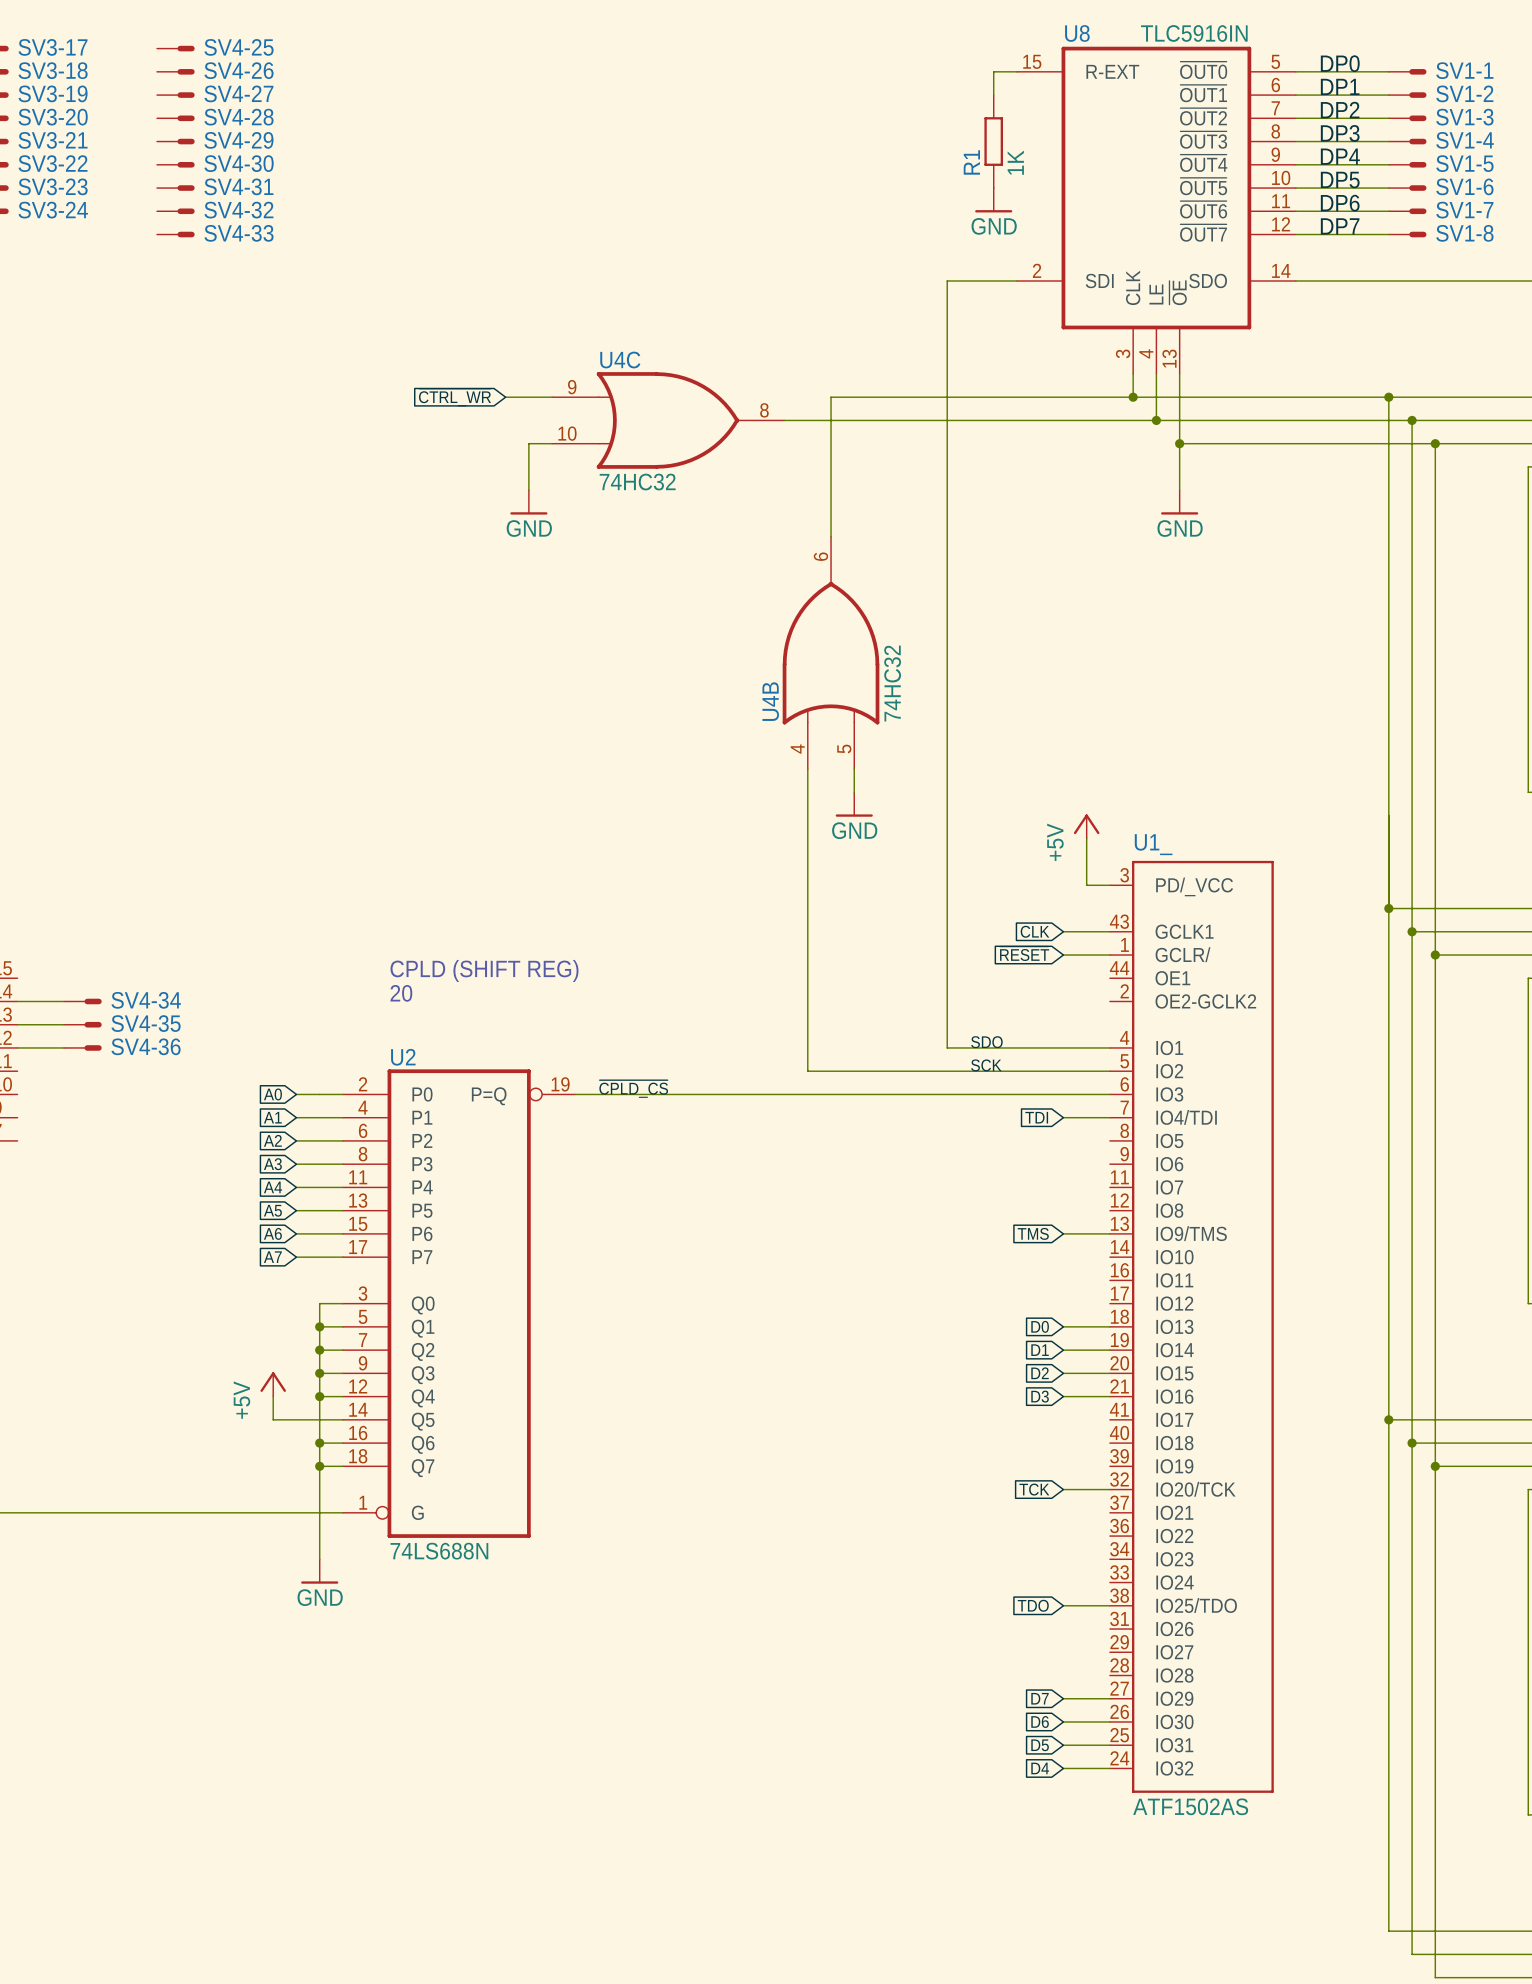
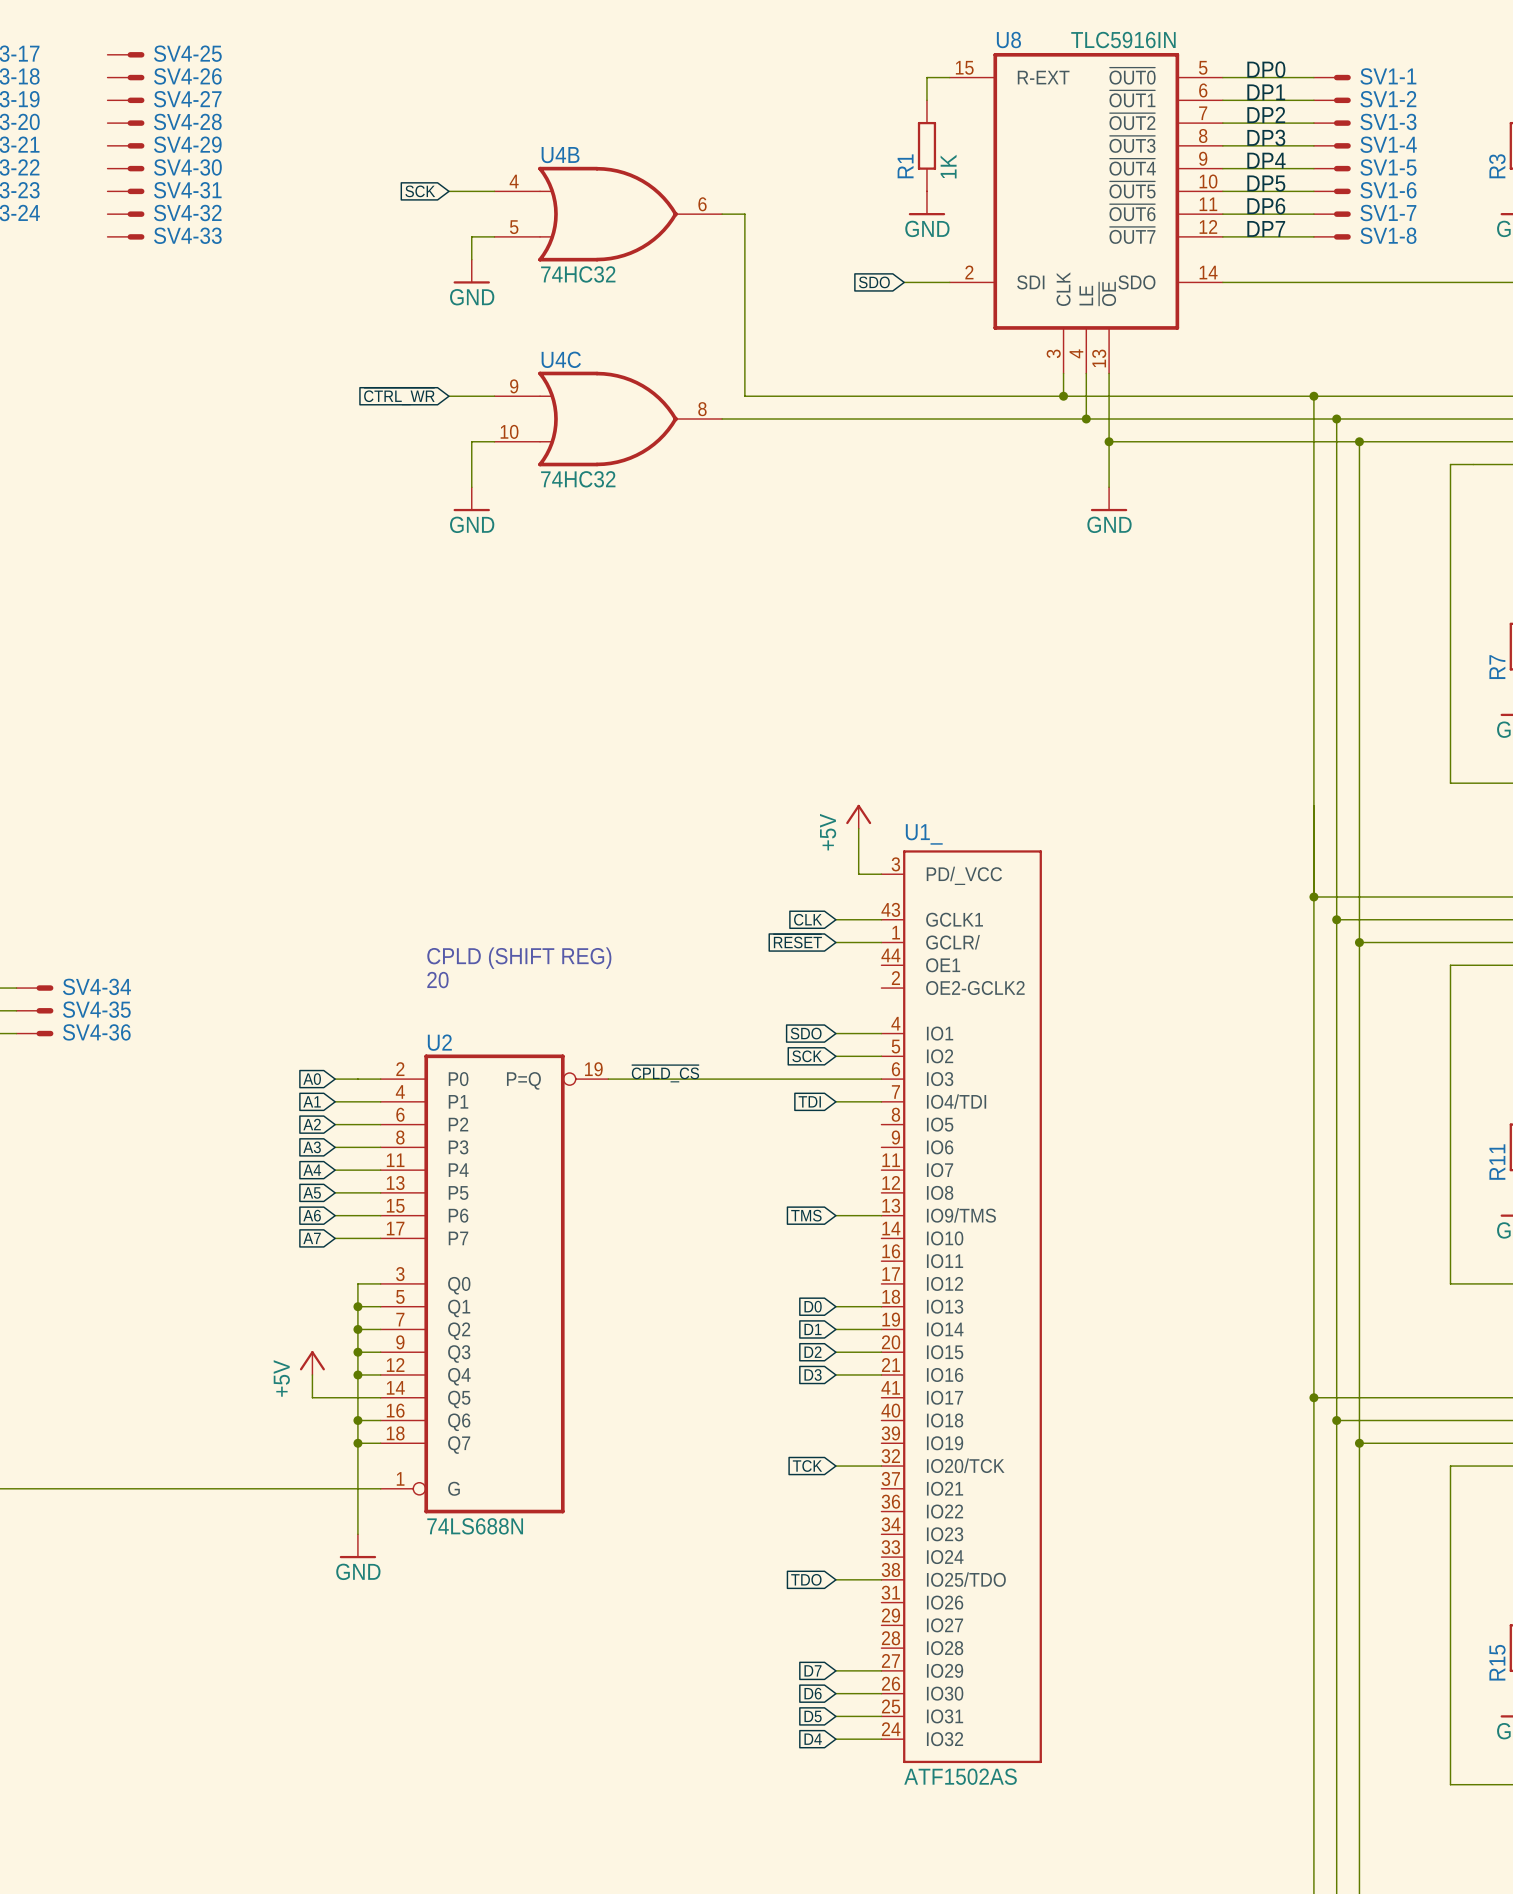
global label: none -> SCK (420, 191)
wire: none -> (448, 191) (494, 191)
wire: none -> (494, 236) (471, 236) (471, 259)
power symbol: none -> GND (471, 271)
global label: none -> SDO (874, 282)
wire: (970, 281) (947, 281) (947, 1047) (1109, 1047) -> none
wire: (831, 397) (831, 536) -> (767, 396) (744, 396) (744, 214) (722, 214)
U4B position: (831, 652) -> (608, 214)
U4B rotation: 0° (831, 653) -> 90° clockwise (607, 214)
wire: (807, 769) (807, 1071) (900, 1071) -> none
wire: (854, 769) (854, 792) -> none
power symbol: GND (854, 804) -> none
power symbol position: +5V (1086, 826) -> +5V (858, 816)
wire: (1086, 838) (1086, 885) (1109, 885) -> (858, 828) (858, 874) (881, 874)
global label position: CLK (1035, 931) -> CLK (808, 919)
wire: (1063, 931) (1109, 931) -> (835, 919) (881, 919)
global label position: ~{RESET} (1024, 953) -> ~{RESET} (797, 941)
wire: (1063, 955) (1109, 955) -> (835, 942) (881, 942)
text position: CPLD (SHIFT REG) (484, 970) -> CPLD (SHIFT REG) (519, 958)
text position: 20 (401, 993) -> 20 (437, 980)
label: SDO (986, 1042) -> none
global label: none -> SDO (806, 1033)
wire: none -> (835, 1033) (881, 1033)
label: SCK (986, 1065) -> none
global label: none -> SCK (807, 1056)
wire: (947, 1071) (1109, 1071) -> none
label position: ~{CPLD_CS} (633, 1088) -> ~{CPLD_CS} (665, 1073)
global label position: A0 (272, 1094) -> A0 (312, 1079)
wire: (296, 1094) (342, 1094) -> (335, 1079) (380, 1079)
wire: (575, 1094) (668, 1094) -> none
wire: (947, 1094) (1109, 1094) -> none
global label position: A1 (272, 1117) -> A1 (312, 1101)
wire: (296, 1117) (342, 1117) -> (335, 1101) (380, 1101)
global label position: TDI (1036, 1117) -> TDI (809, 1101)
wire: (1063, 1117) (1109, 1117) -> (835, 1101) (881, 1101)
global label position: A2 (272, 1140) -> A2 (312, 1124)
wire: (296, 1140) (342, 1140) -> (335, 1124) (380, 1124)
global label position: A3 (272, 1164) -> A3 (312, 1147)
wire: (296, 1164) (342, 1164) -> (335, 1147) (380, 1147)
global label position: A4 (273, 1187) -> A4 (312, 1170)
wire: (296, 1187) (342, 1187) -> (335, 1170) (380, 1170)
global label position: A5 (272, 1210) -> A5 (312, 1192)
wire: (296, 1210) (342, 1210) -> (335, 1192) (380, 1192)
global label position: A6 (272, 1233) -> A6 (312, 1215)
wire: (296, 1233) (342, 1233) -> (335, 1215) (380, 1215)
global label position: TMS (1033, 1233) -> TMS (806, 1215)
wire: (1063, 1233) (1109, 1233) -> (835, 1215) (881, 1215)
global label position: A7 (272, 1257) -> A7 (312, 1238)
wire: (296, 1257) (342, 1257) -> (335, 1238) (380, 1238)
wire: (342, 1303) (319, 1303) (319, 1559) -> (380, 1283) (357, 1283) (357, 1534)
U2 position: (459, 1303) -> (494, 1283)
wire: (319, 1326) (342, 1326) -> (357, 1306) (380, 1306)
junction: (319, 1326) -> none
junction: none -> (357, 1306)
global label position: D0 (1040, 1326) -> D0 (813, 1306)
wire: (1063, 1326) (1109, 1326) -> (835, 1306) (881, 1306)
U1_ position: (1191, 1326) -> (961, 1306)
wire: (319, 1350) (342, 1350) -> (357, 1329) (380, 1329)
junction: (319, 1350) -> none
junction: none -> (357, 1329)
global label position: D1 (1040, 1350) -> D1 (813, 1329)
wire: (1063, 1350) (1109, 1350) -> (835, 1329) (881, 1329)
wire: (319, 1373) (342, 1373) -> (357, 1352) (380, 1352)
junction: (319, 1373) -> none
junction: none -> (357, 1352)
global label position: D2 (1040, 1373) -> D2 (812, 1352)
wire: (1063, 1373) (1109, 1373) -> (835, 1352) (881, 1352)
power symbol position: +5V (273, 1384) -> +5V (312, 1363)
wire: (273, 1396) (273, 1419) (342, 1419) -> (312, 1374) (312, 1397) (380, 1397)
wire: (319, 1396) (342, 1396) -> (357, 1374) (380, 1374)
junction: (319, 1396) -> none
junction: none -> (357, 1374)
global label position: D3 (1040, 1396) -> D3 (813, 1374)
wire: (1063, 1396) (1109, 1396) -> (835, 1374) (881, 1374)
wire: (319, 1443) (342, 1443) -> (357, 1420) (380, 1420)
junction: (319, 1443) -> none
junction: none -> (357, 1420)
wire: (319, 1466) (342, 1466) -> (357, 1443) (380, 1443)
junction: (319, 1466) -> none
junction: none -> (357, 1443)
global label position: TCK (1034, 1489) -> TCK (807, 1466)
wire: (1063, 1489) (1109, 1489) -> (835, 1466) (881, 1466)
wire: none -> (289, 1488) (380, 1488)
power symbol position: GND (319, 1571) -> GND (357, 1546)
global label position: TDO (1033, 1605) -> TDO (806, 1579)
wire: (1063, 1605) (1109, 1605) -> (835, 1579) (881, 1579)
global label position: D7 (1040, 1698) -> D7 (812, 1670)
wire: (1063, 1698) (1109, 1698) -> (835, 1670) (881, 1670)
global label position: D6 (1040, 1721) -> D6 (813, 1693)
wire: (1063, 1721) (1109, 1721) -> (835, 1693) (881, 1693)
global label position: D5 (1040, 1745) -> D5 (813, 1716)
wire: (1063, 1745) (1109, 1745) -> (835, 1716) (881, 1716)
global label position: D4 (1040, 1768) -> D4 (813, 1739)
wire: (1063, 1768) (1109, 1768) -> (835, 1739) (881, 1739)

